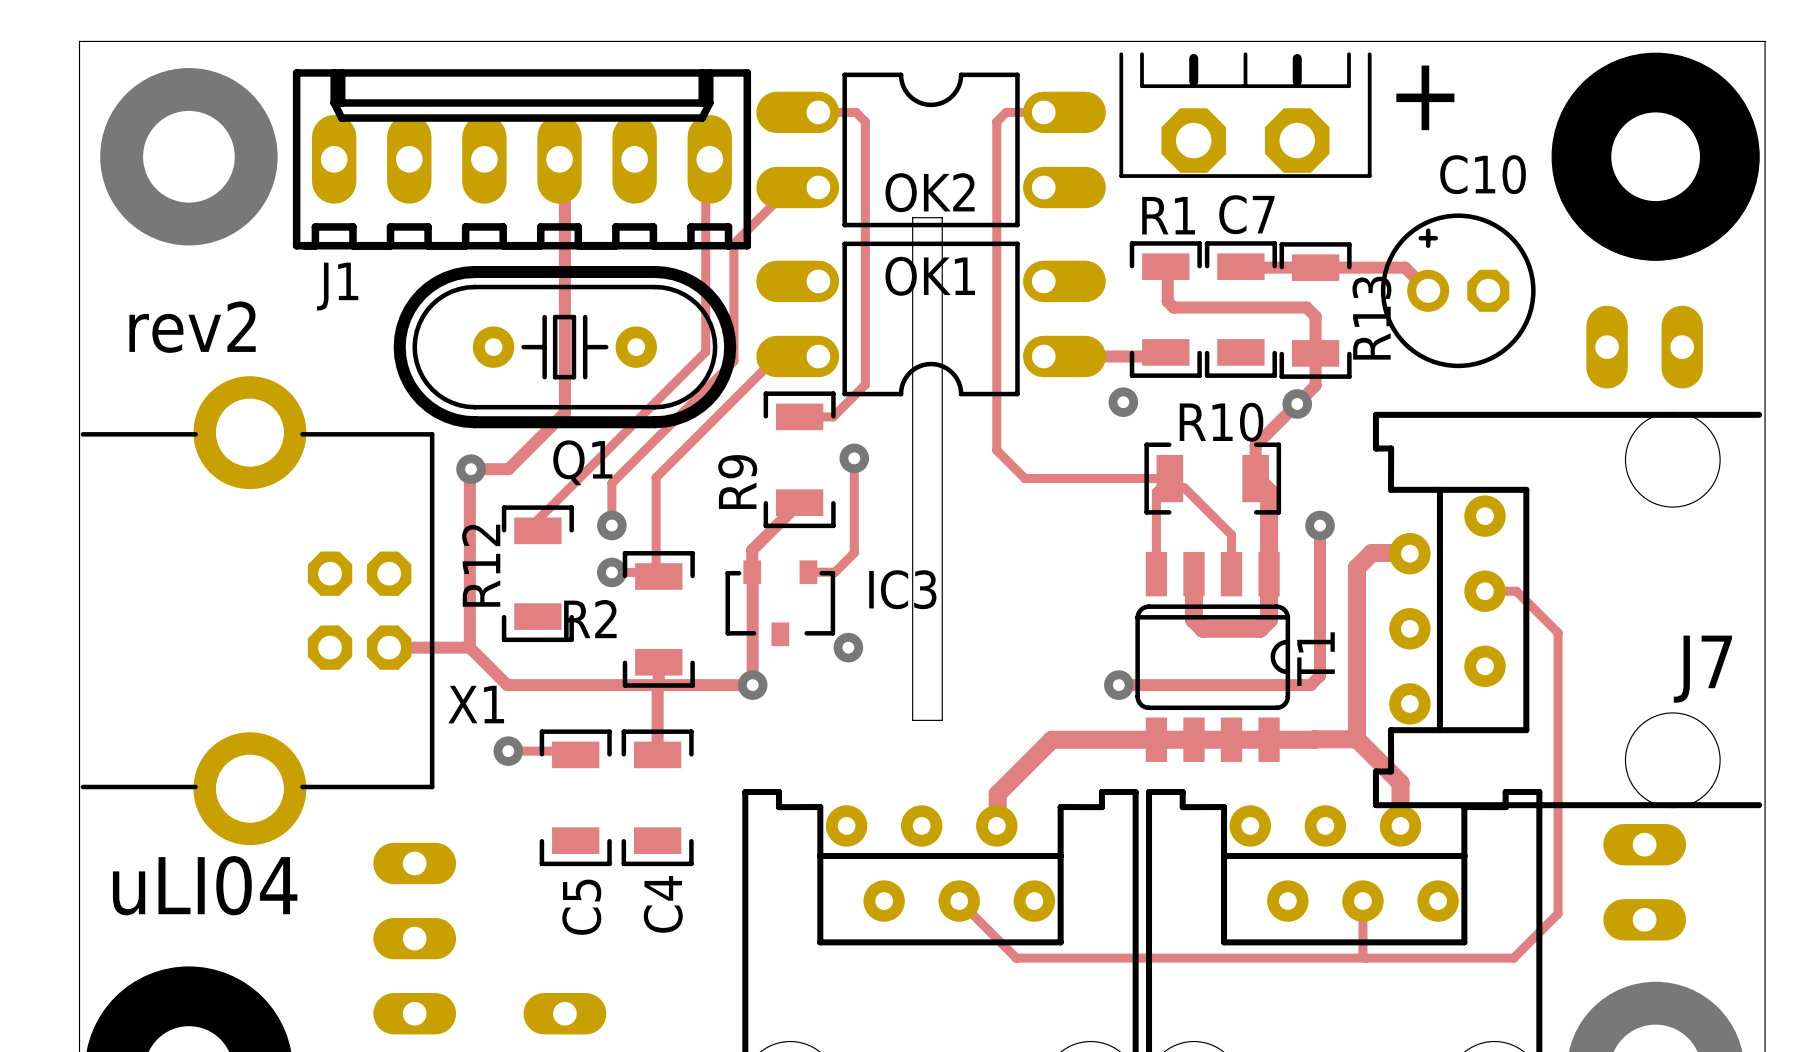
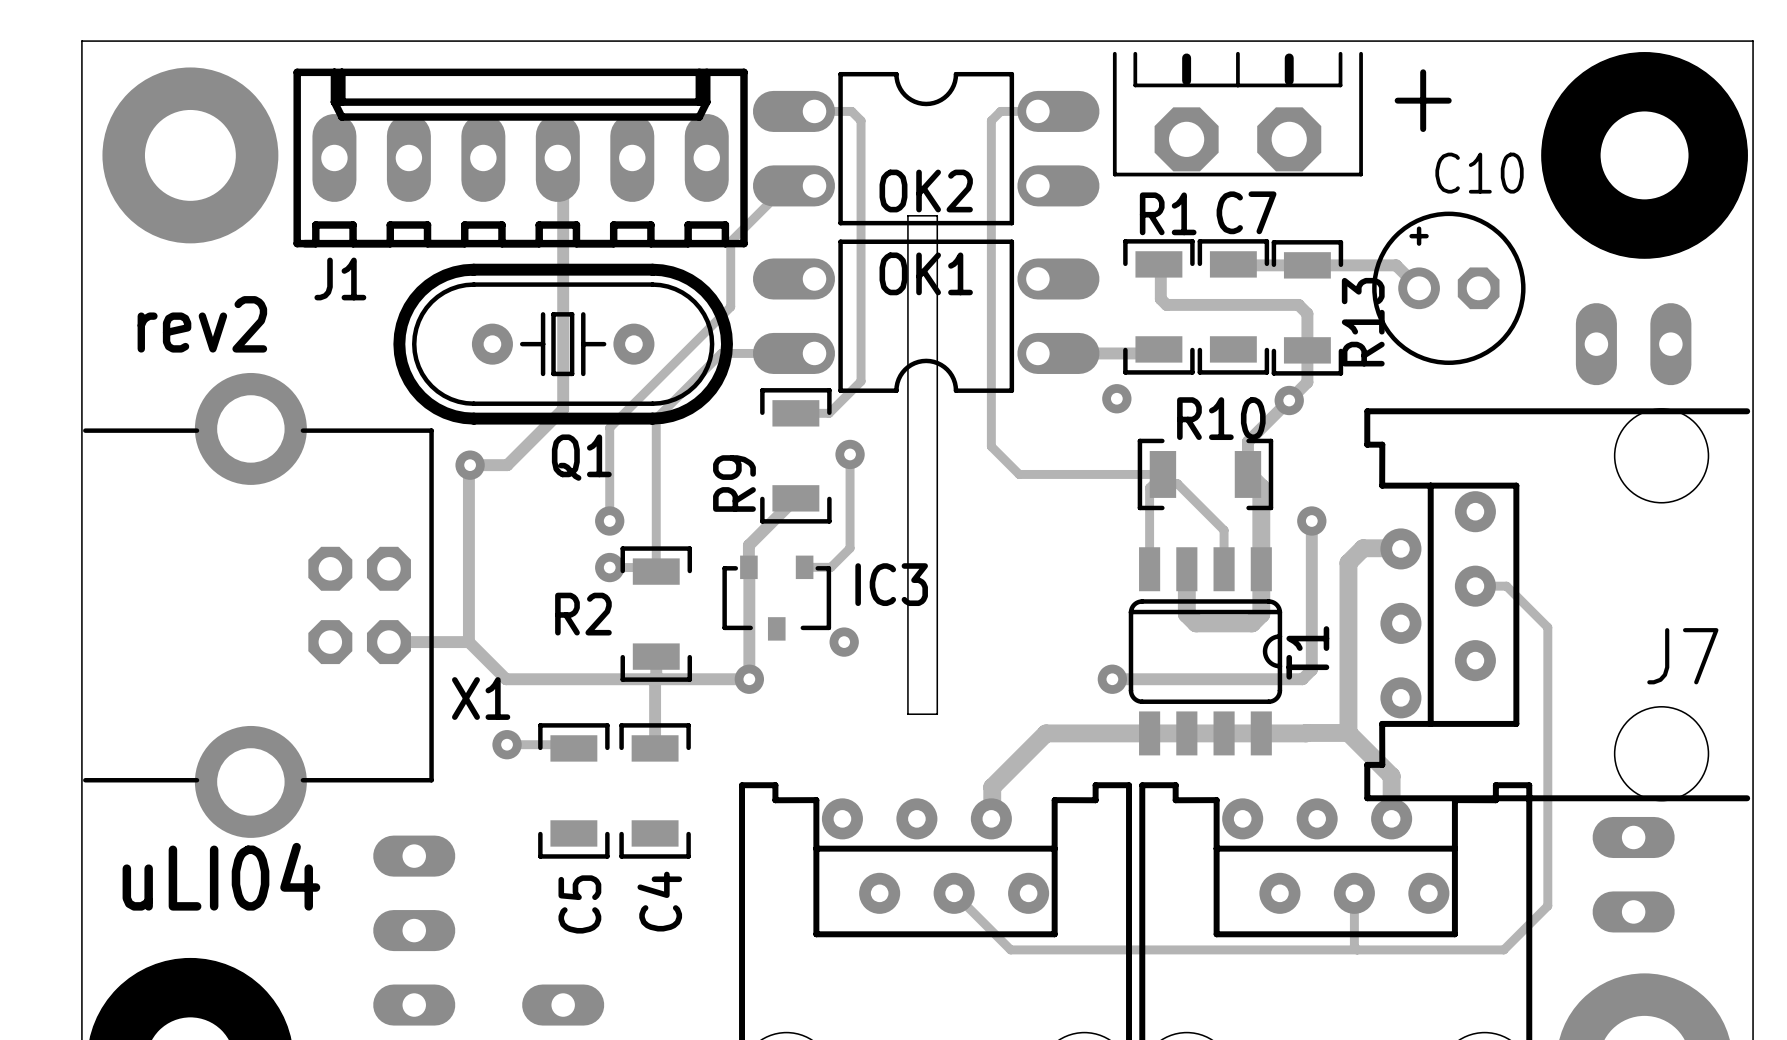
track: (709, 159) (705, 163) (705, 351) (537, 519) (537, 530) -> none
track: (733, 309) (733, 361) (611, 483) -> (730, 306) (609, 427) (609, 479)
track: (777, 356) (656, 477) (656, 573) -> (773, 353) (721, 353) (656, 418) (656, 571)
R12: (537, 573) -> none

